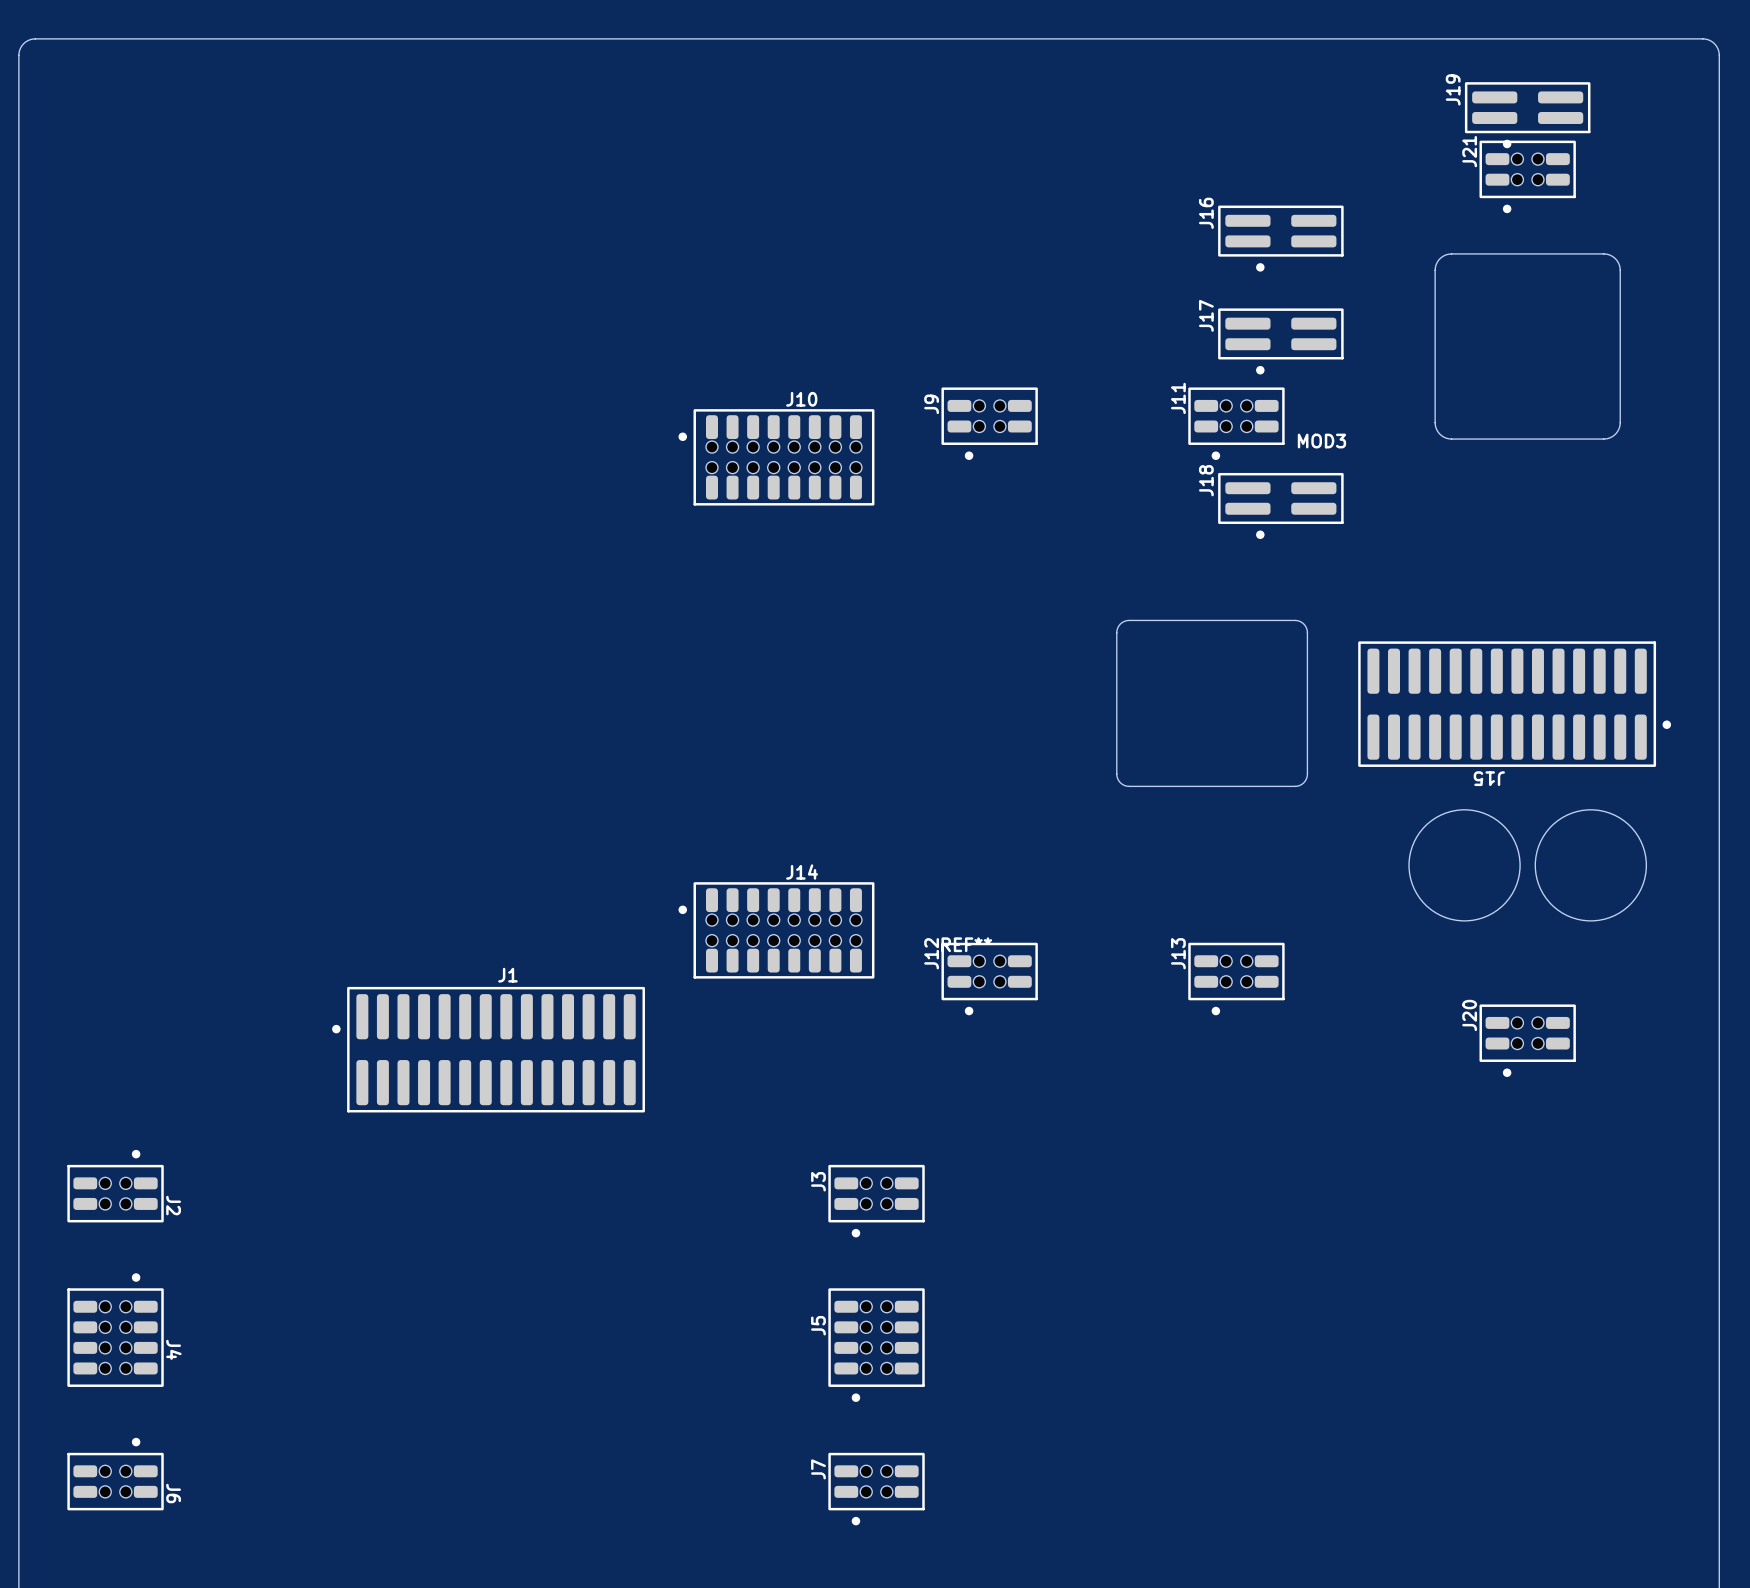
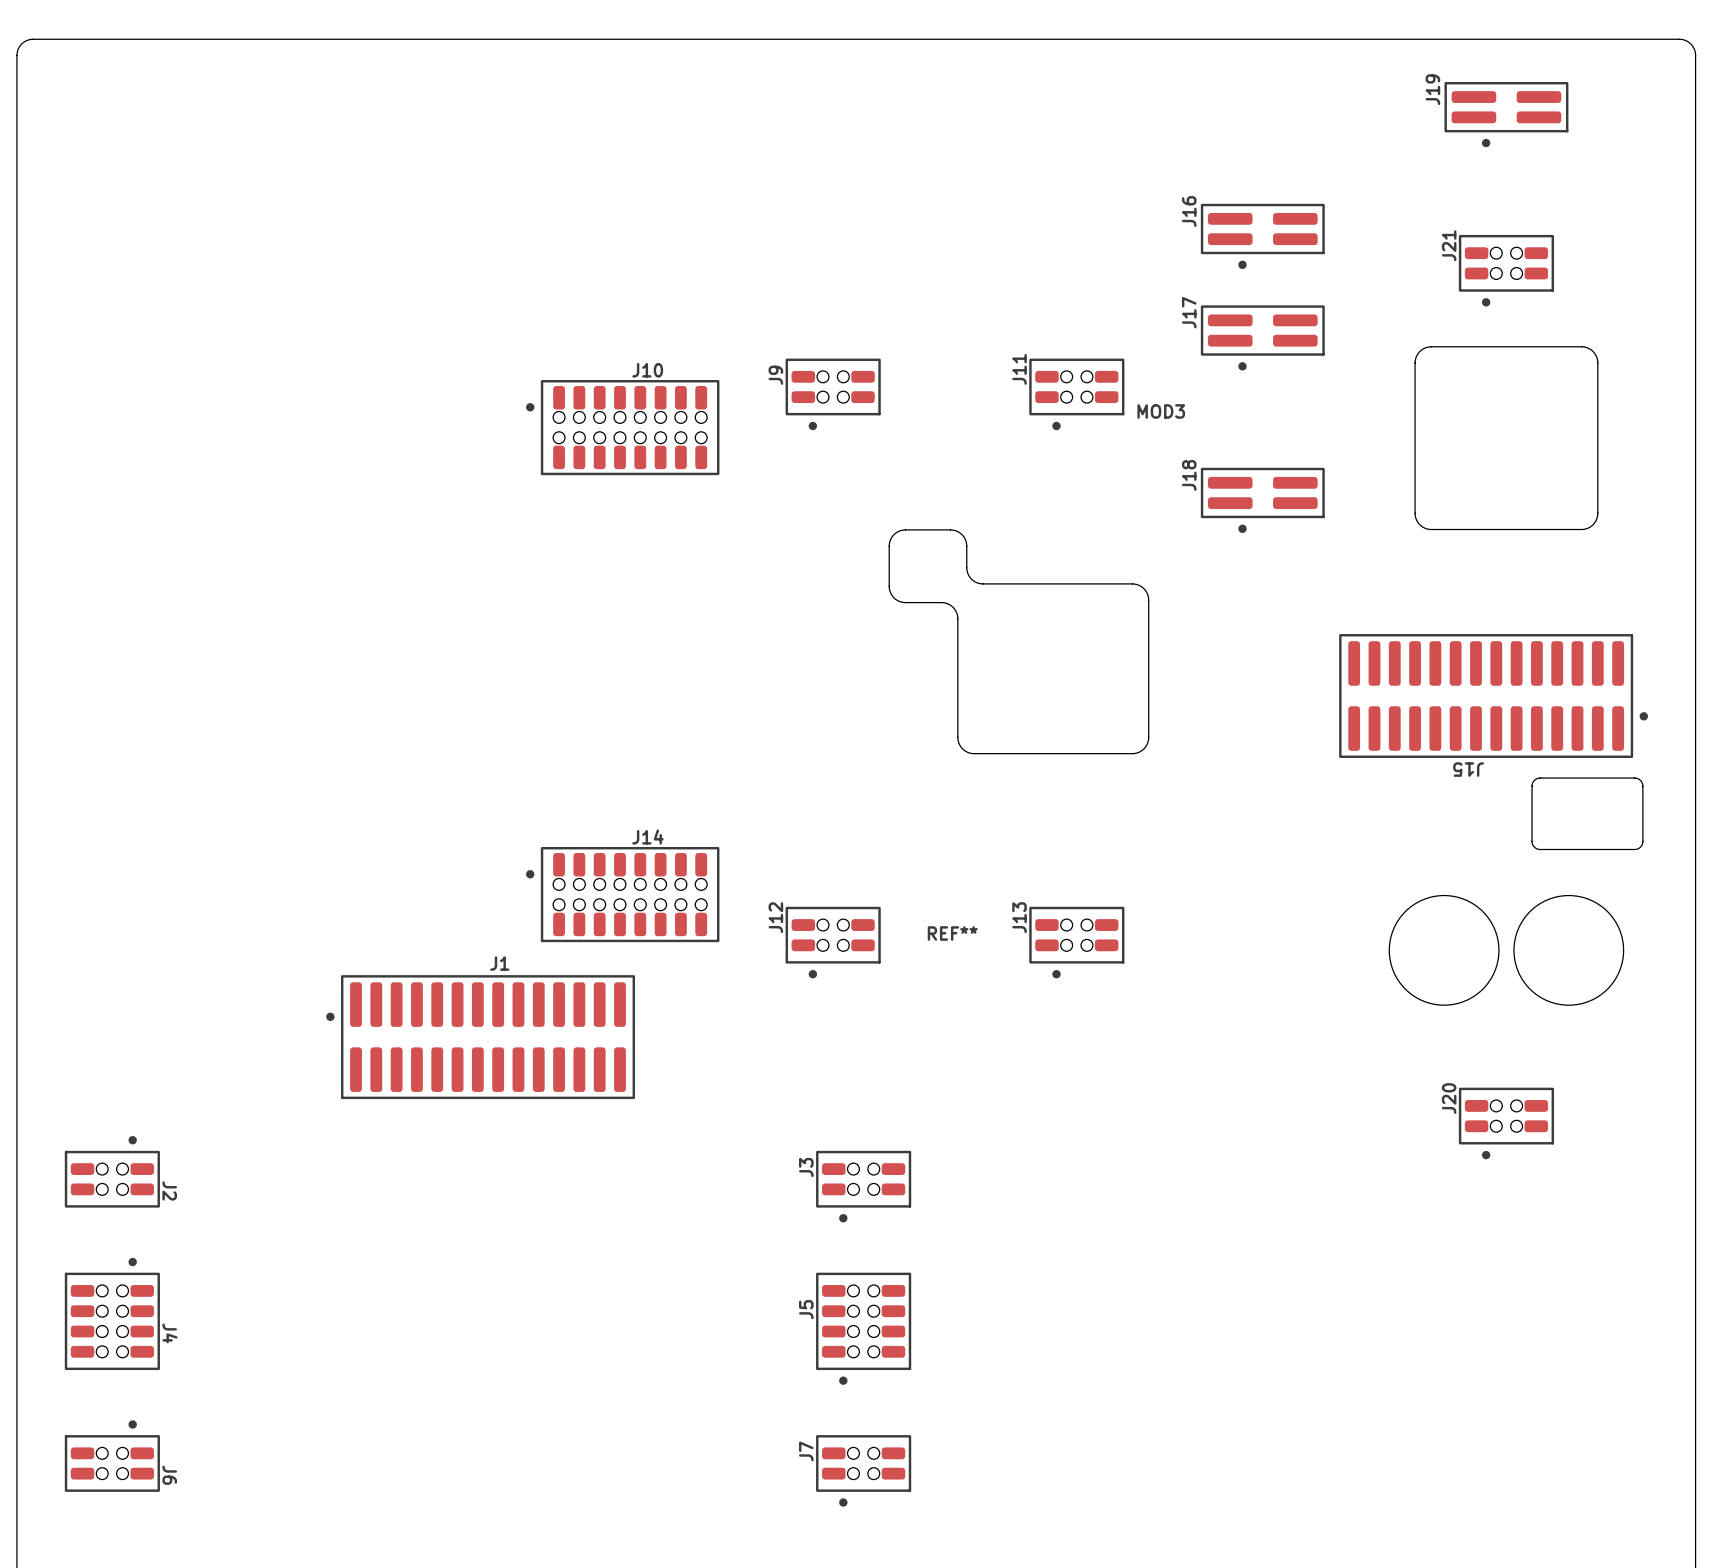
J21 position: (1527, 176) -> (1506, 270)
drawing: [1408, 253, 1647, 922] -> none
drawing: none -> [1388, 346, 1644, 1006]
J9 position: (989, 423) -> (833, 394)
J11 position: (1236, 423) -> (1076, 394)
MOD3 name position: MOD3 (1321, 441) -> MOD3 (1161, 411)
J10 position: (776, 457) -> (622, 427)
MOD3 footprint: [1116, 620, 1308, 787] -> [888, 529, 1150, 755]
J14 position: (776, 930) -> (622, 894)
J12 position: (989, 979) -> (833, 942)
J13 position: (1236, 979) -> (1076, 942)
J20 position: (1527, 1040) -> (1506, 1123)

